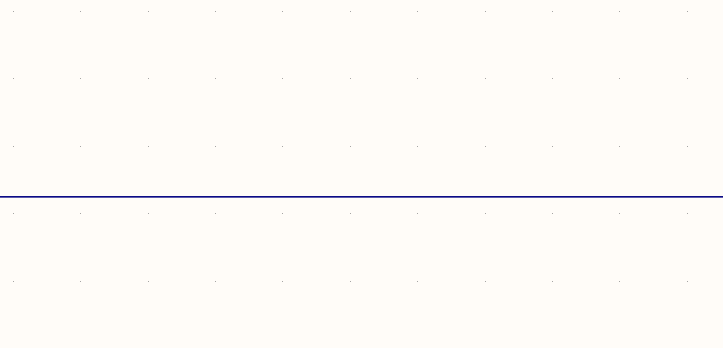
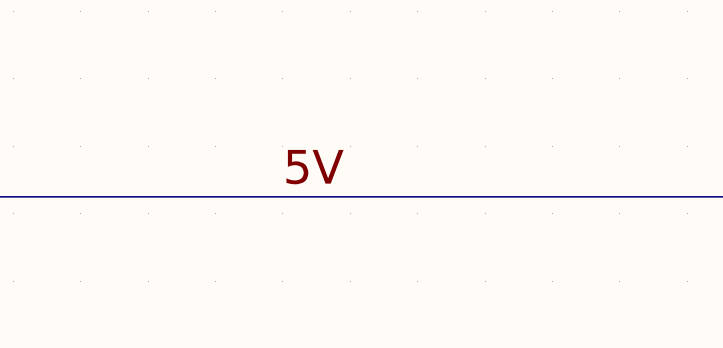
label: none -> 5V (315, 167)

